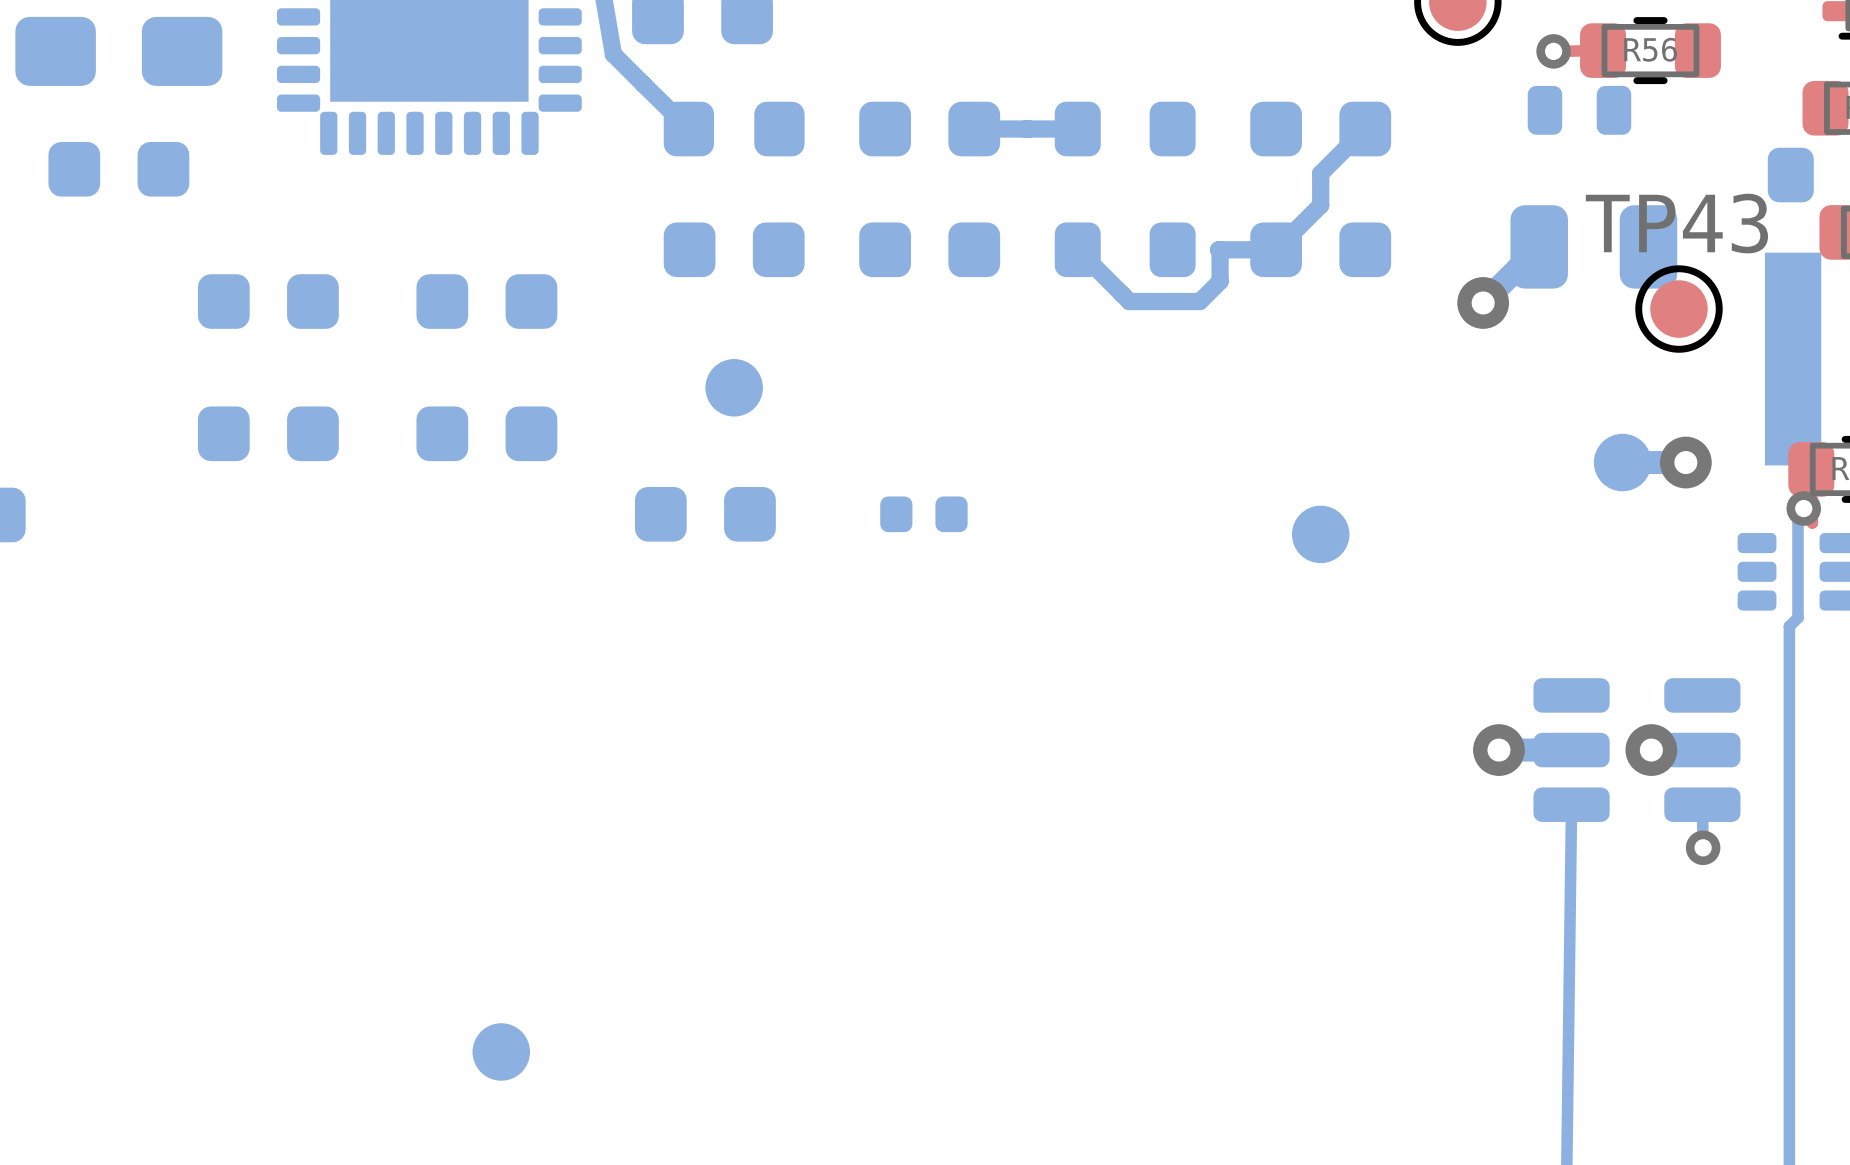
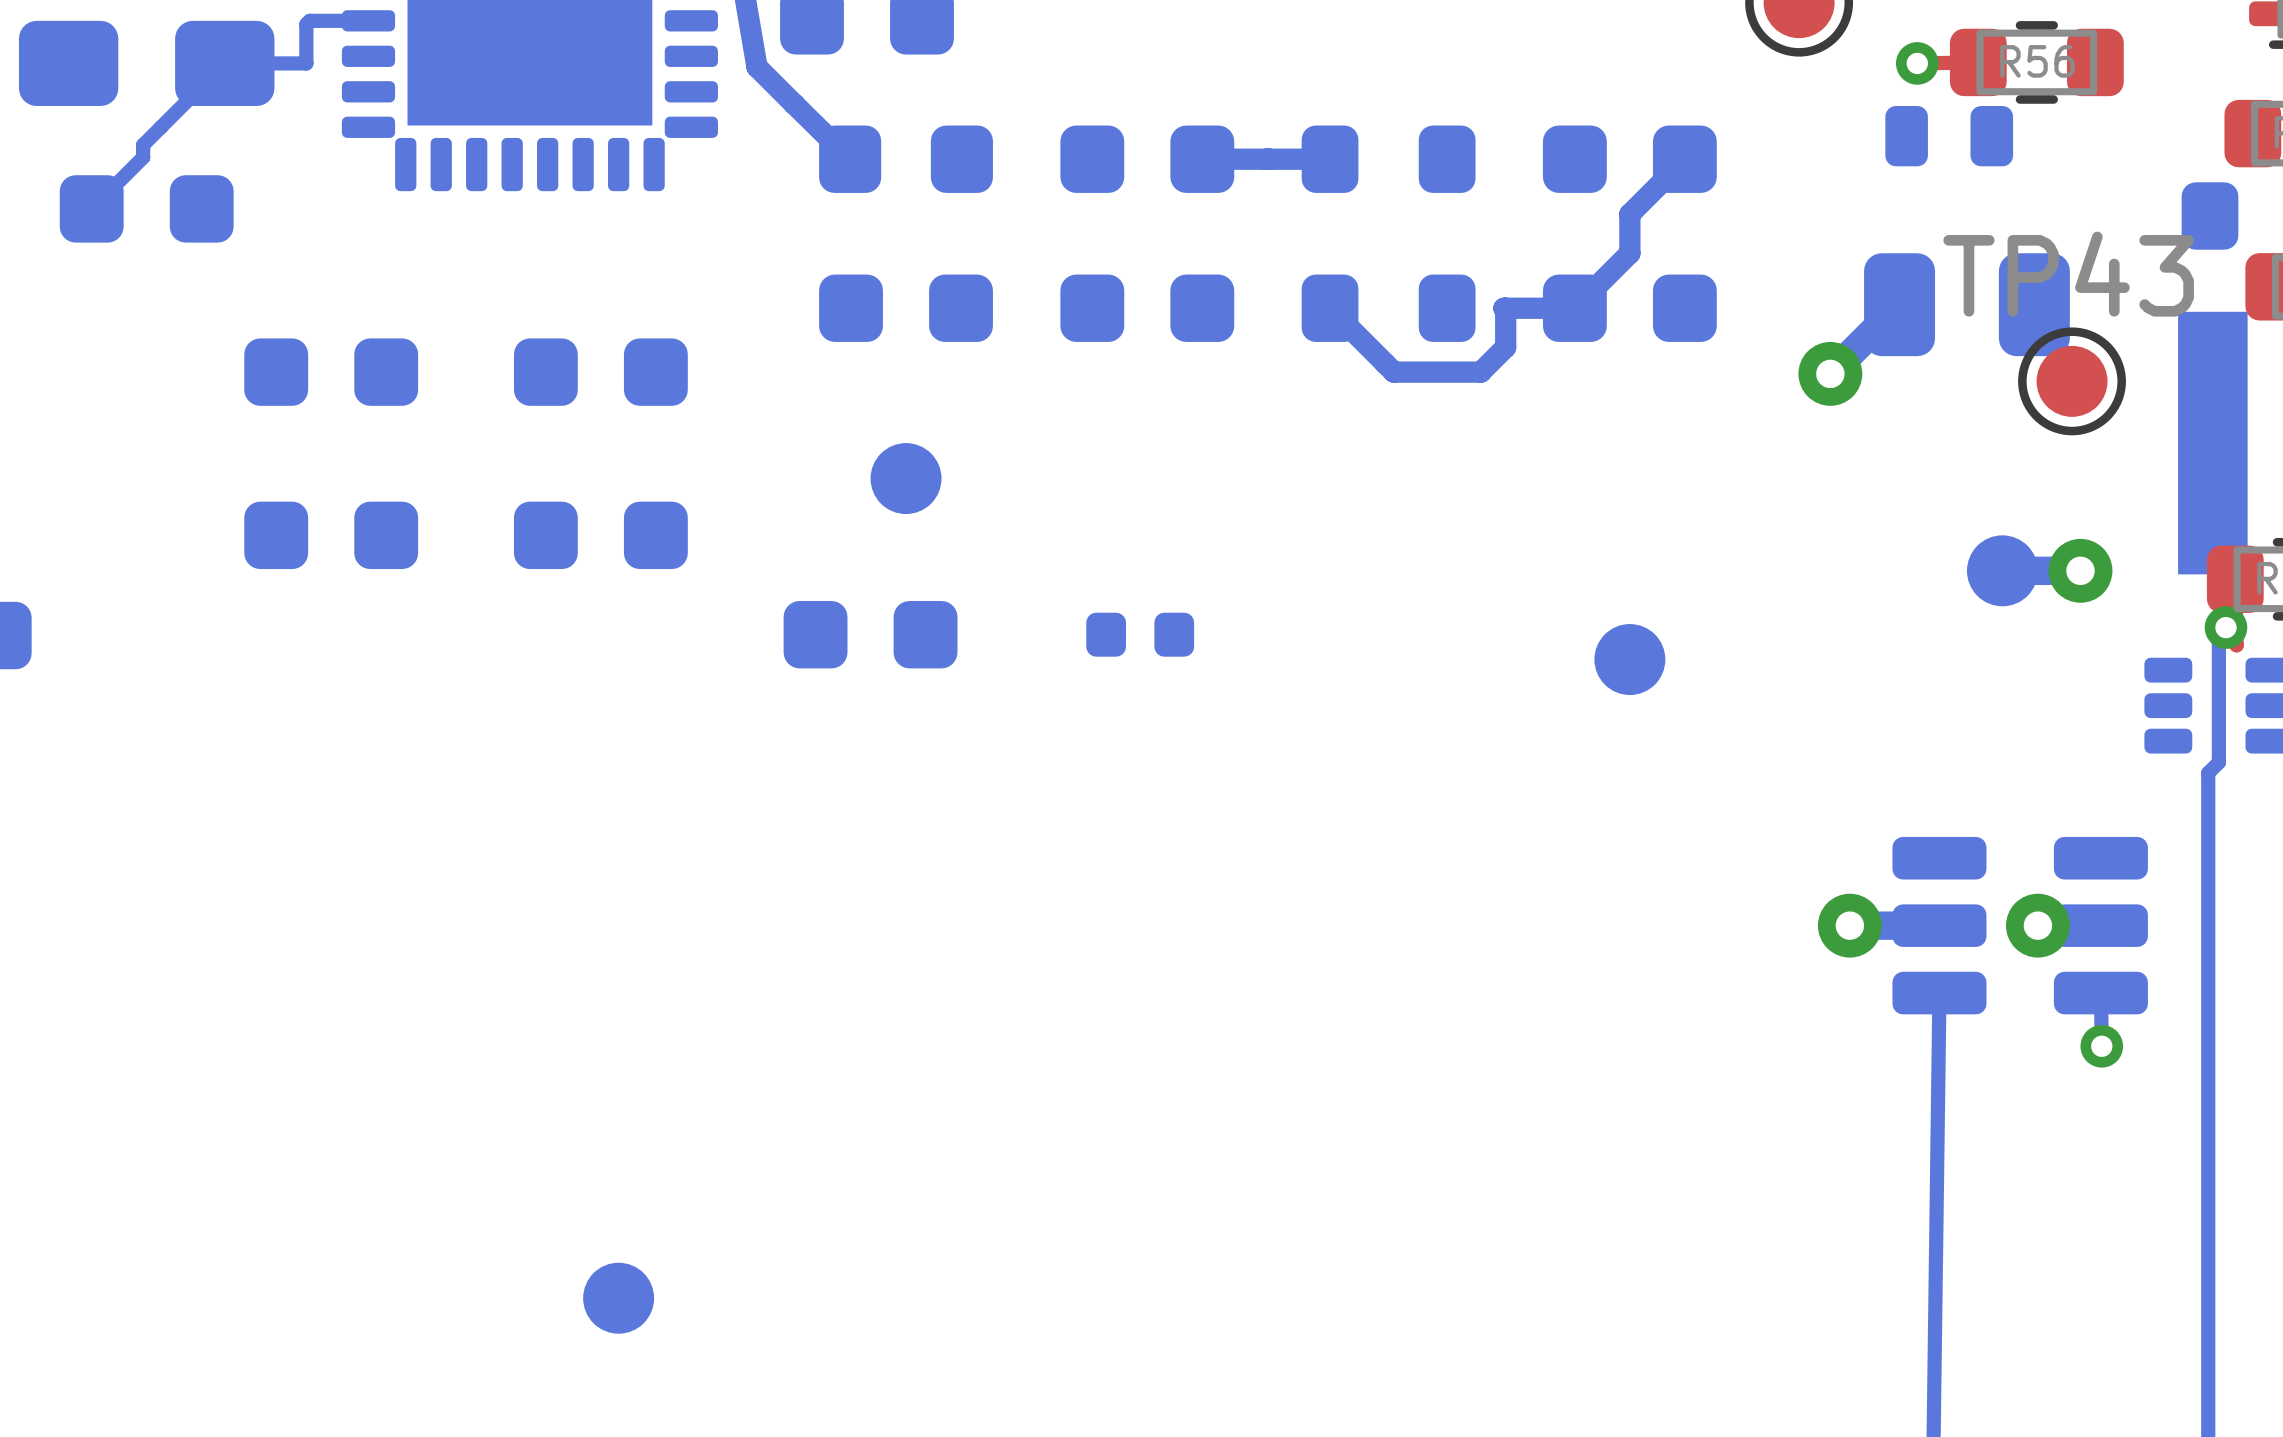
bottom track: none -> (368, 20) (309, 20) (306, 24) (306, 63) (224, 63) (143, 145) (143, 157) (91, 208)

